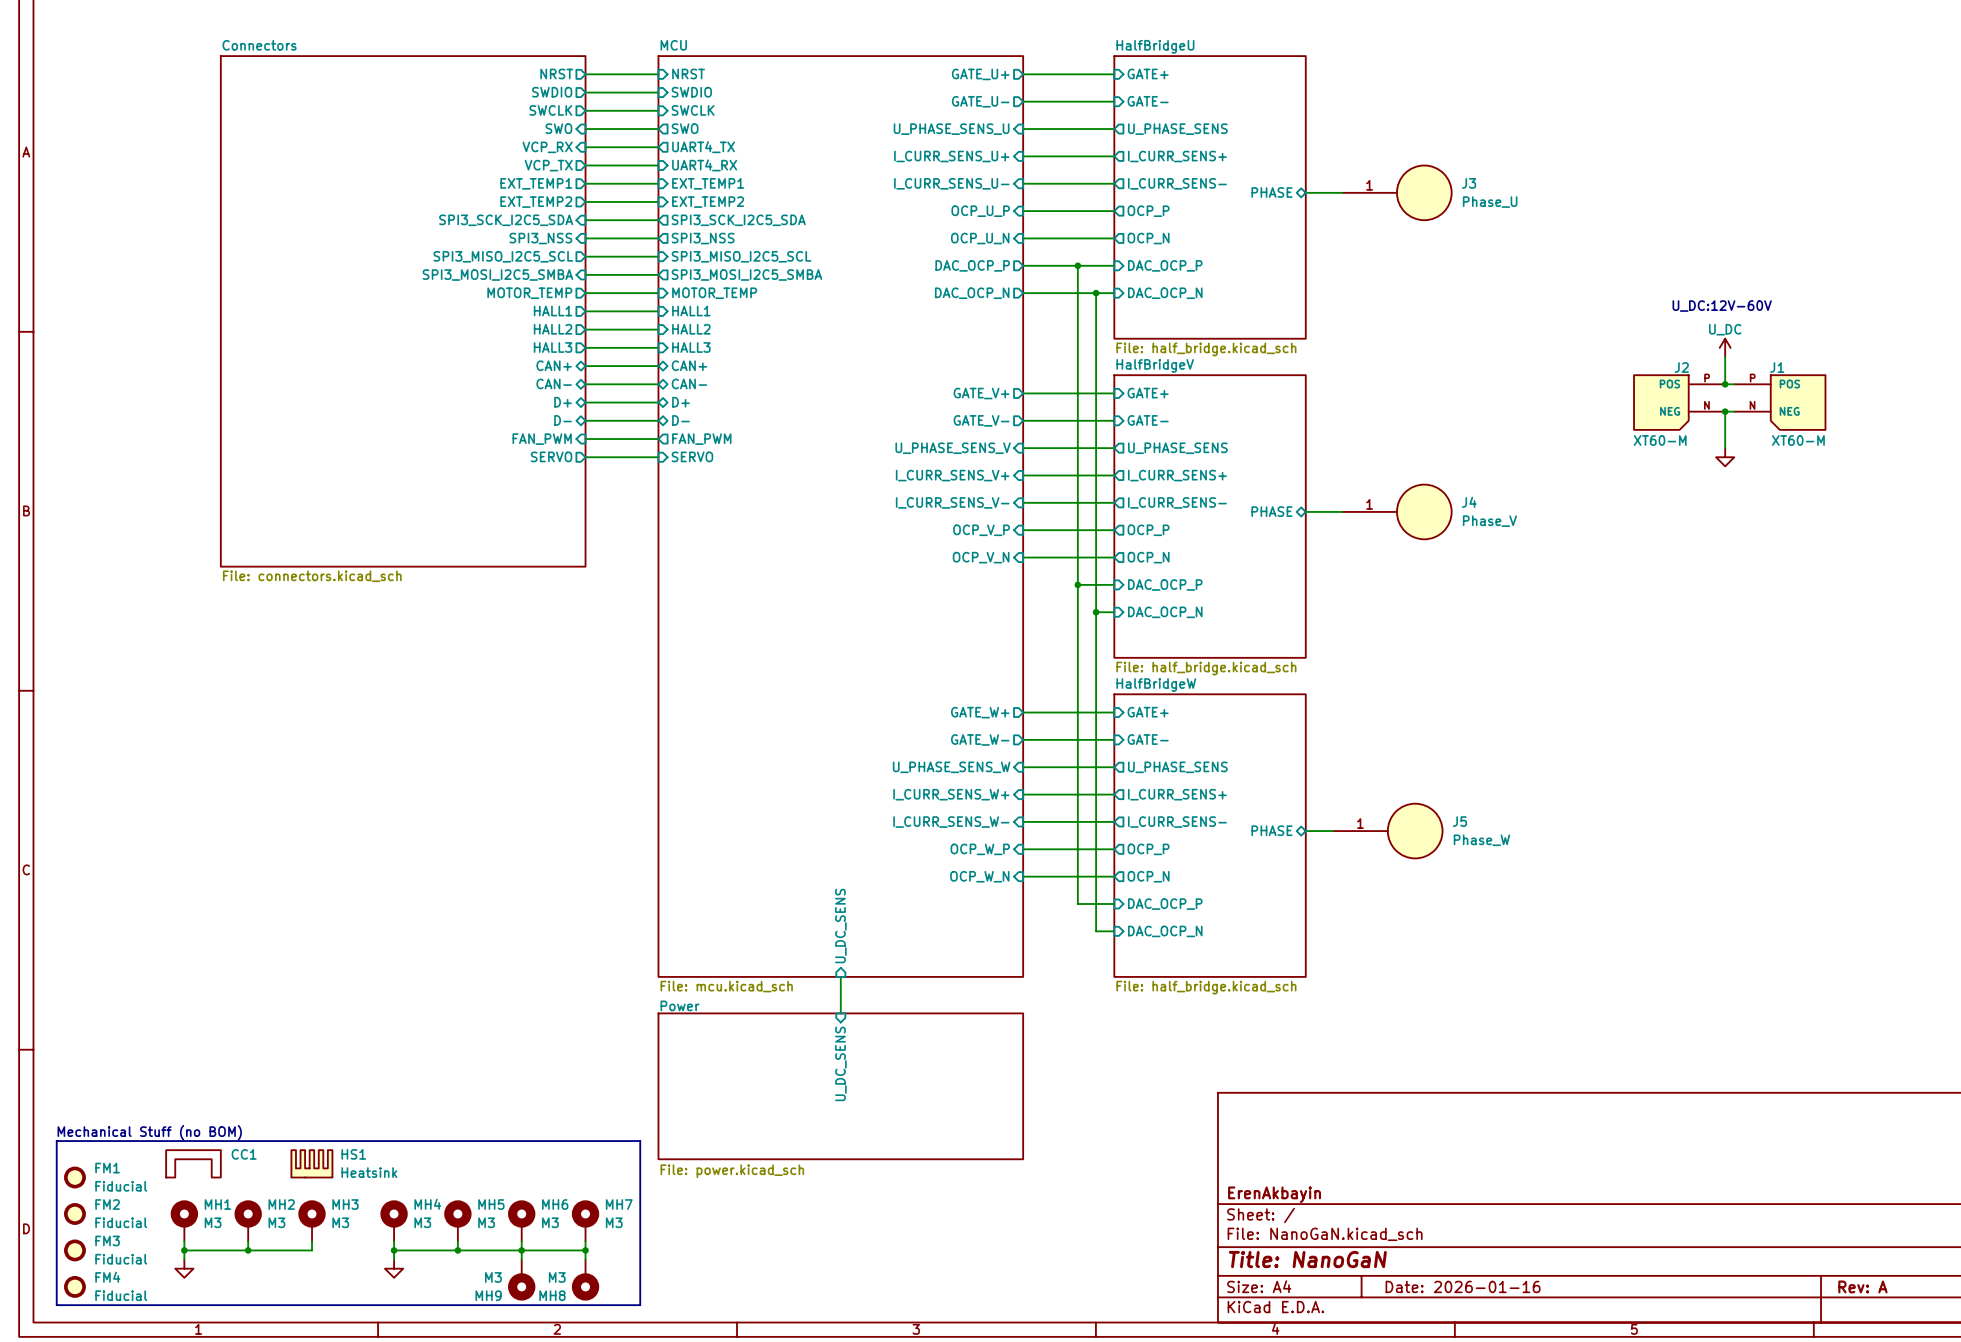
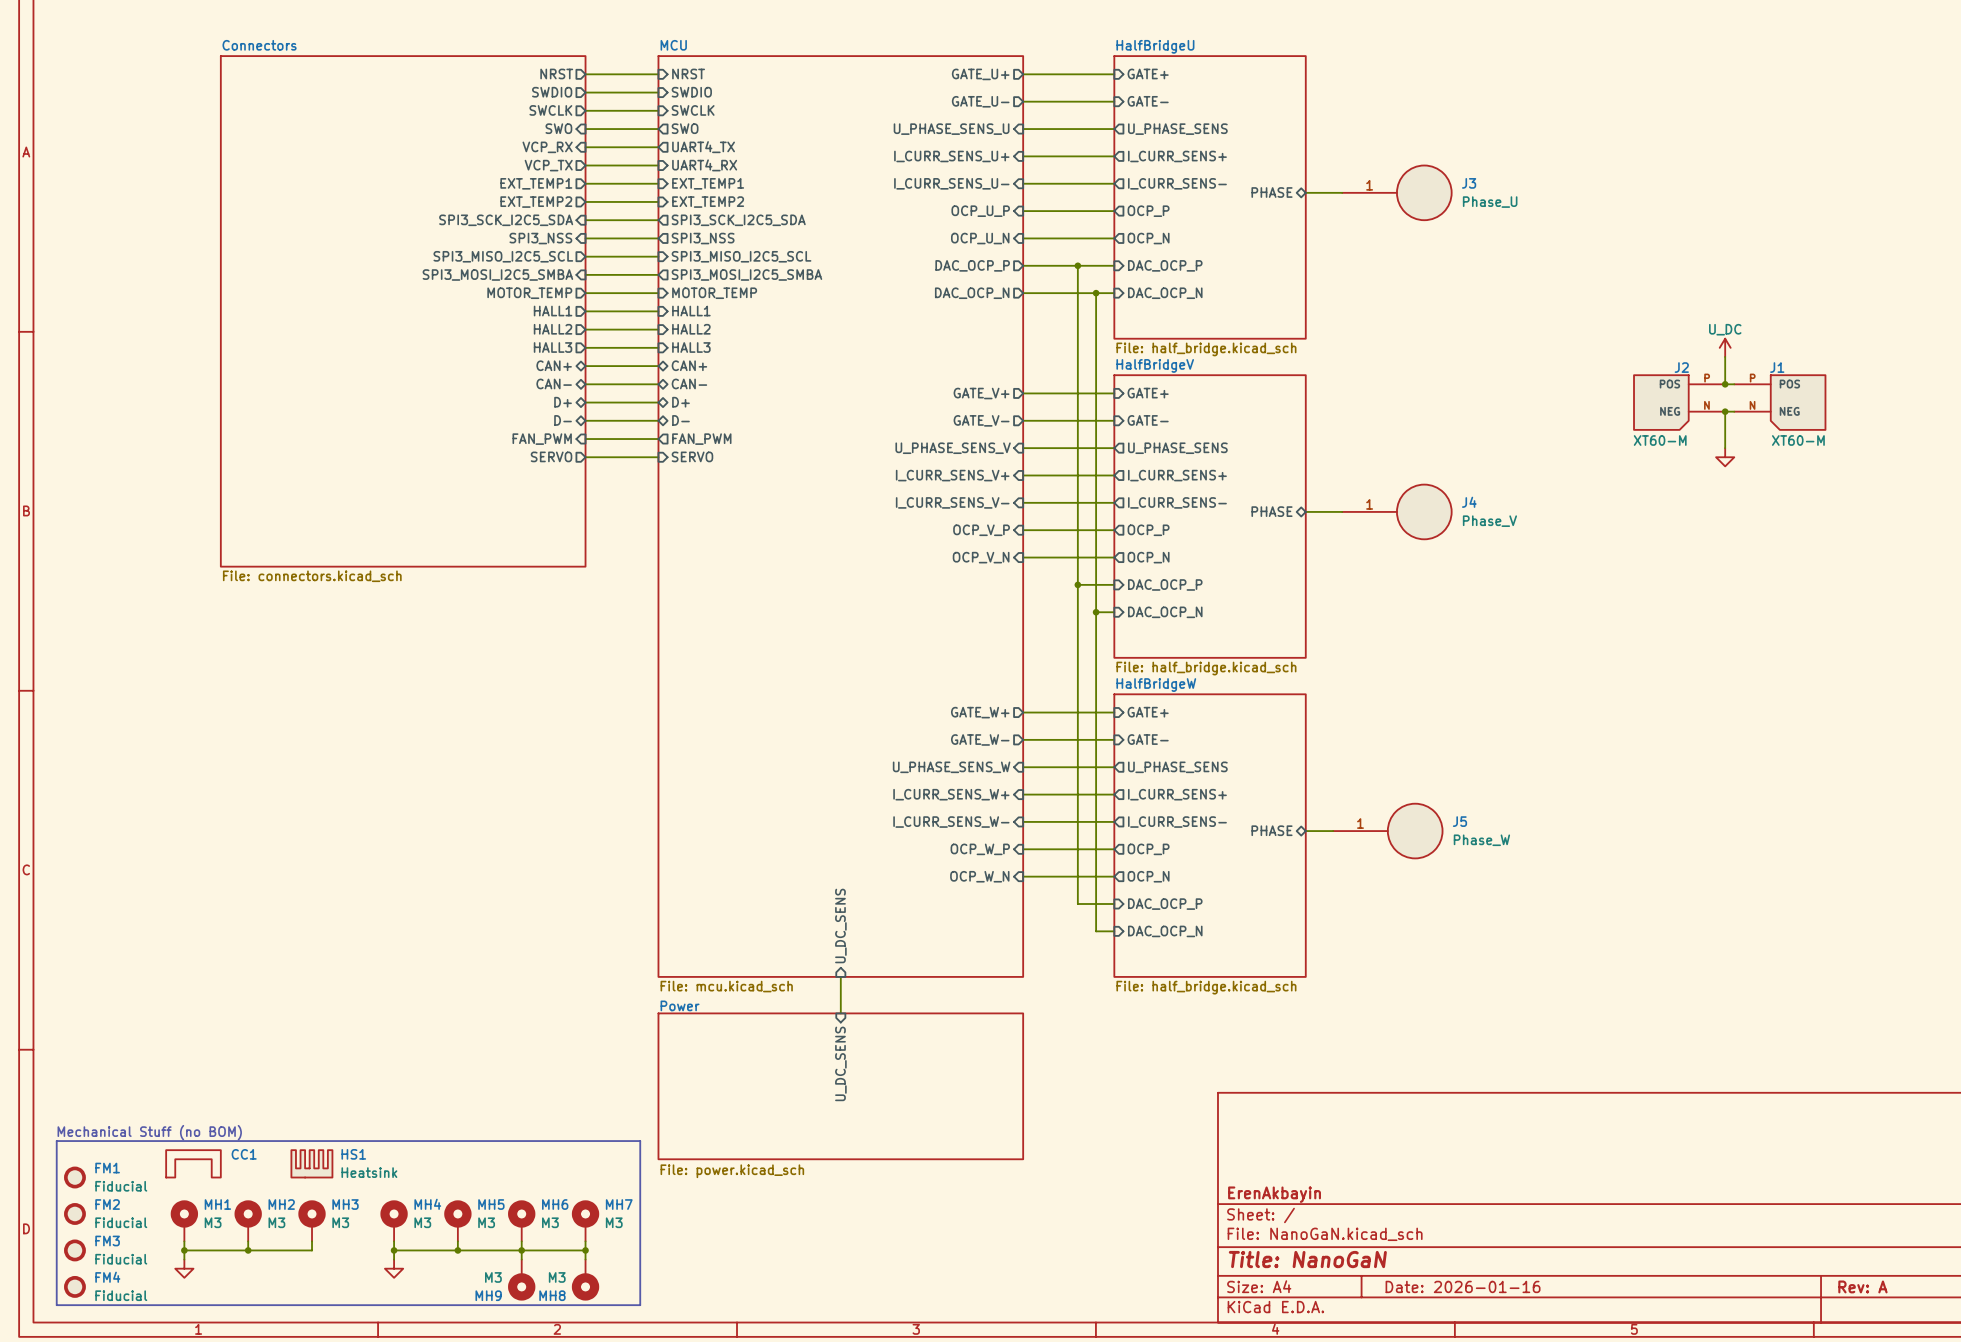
text: U_DC:12V-60V (1722, 306) -> none

